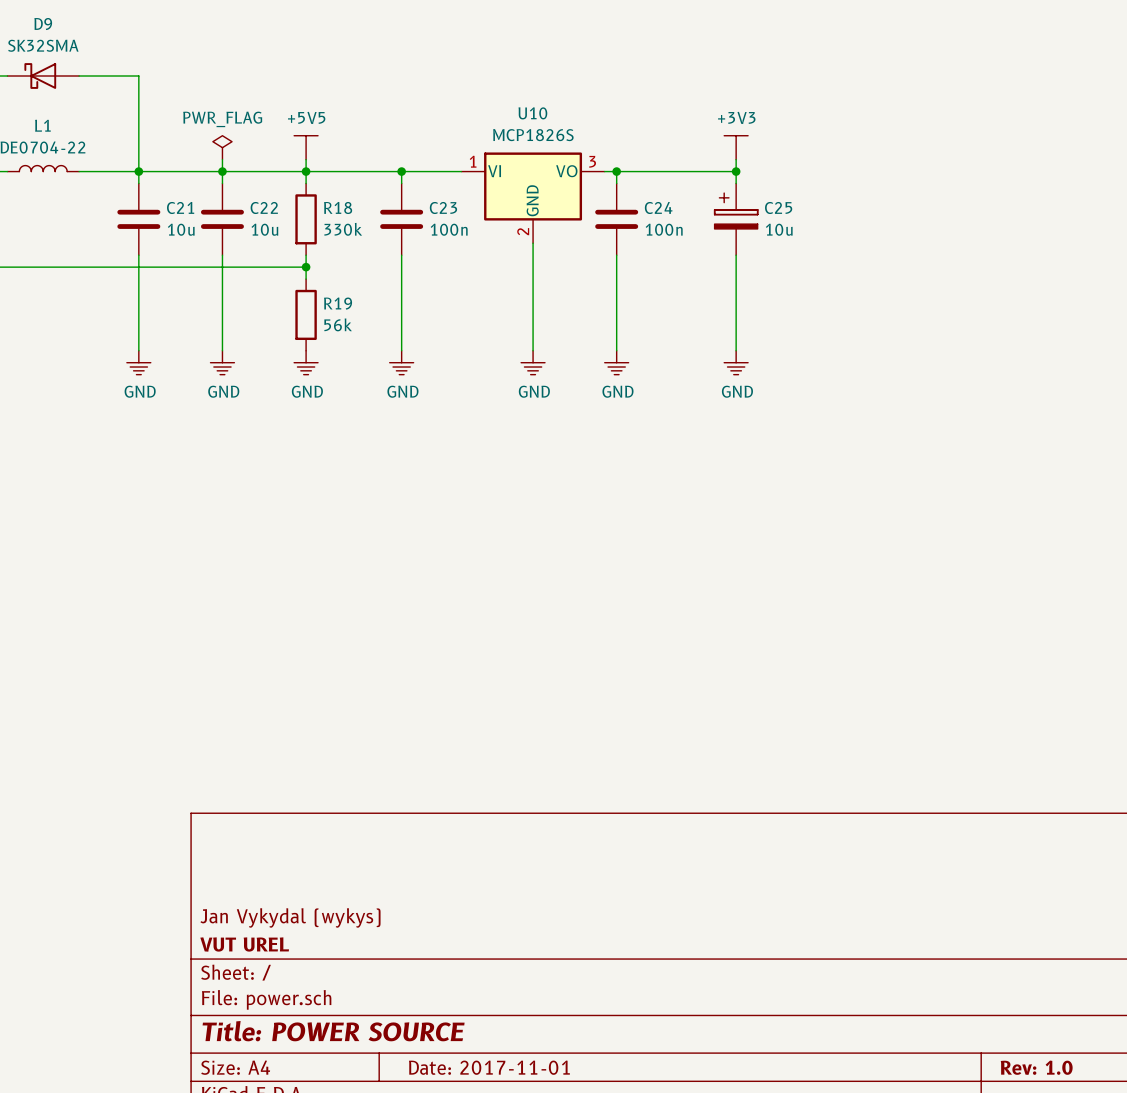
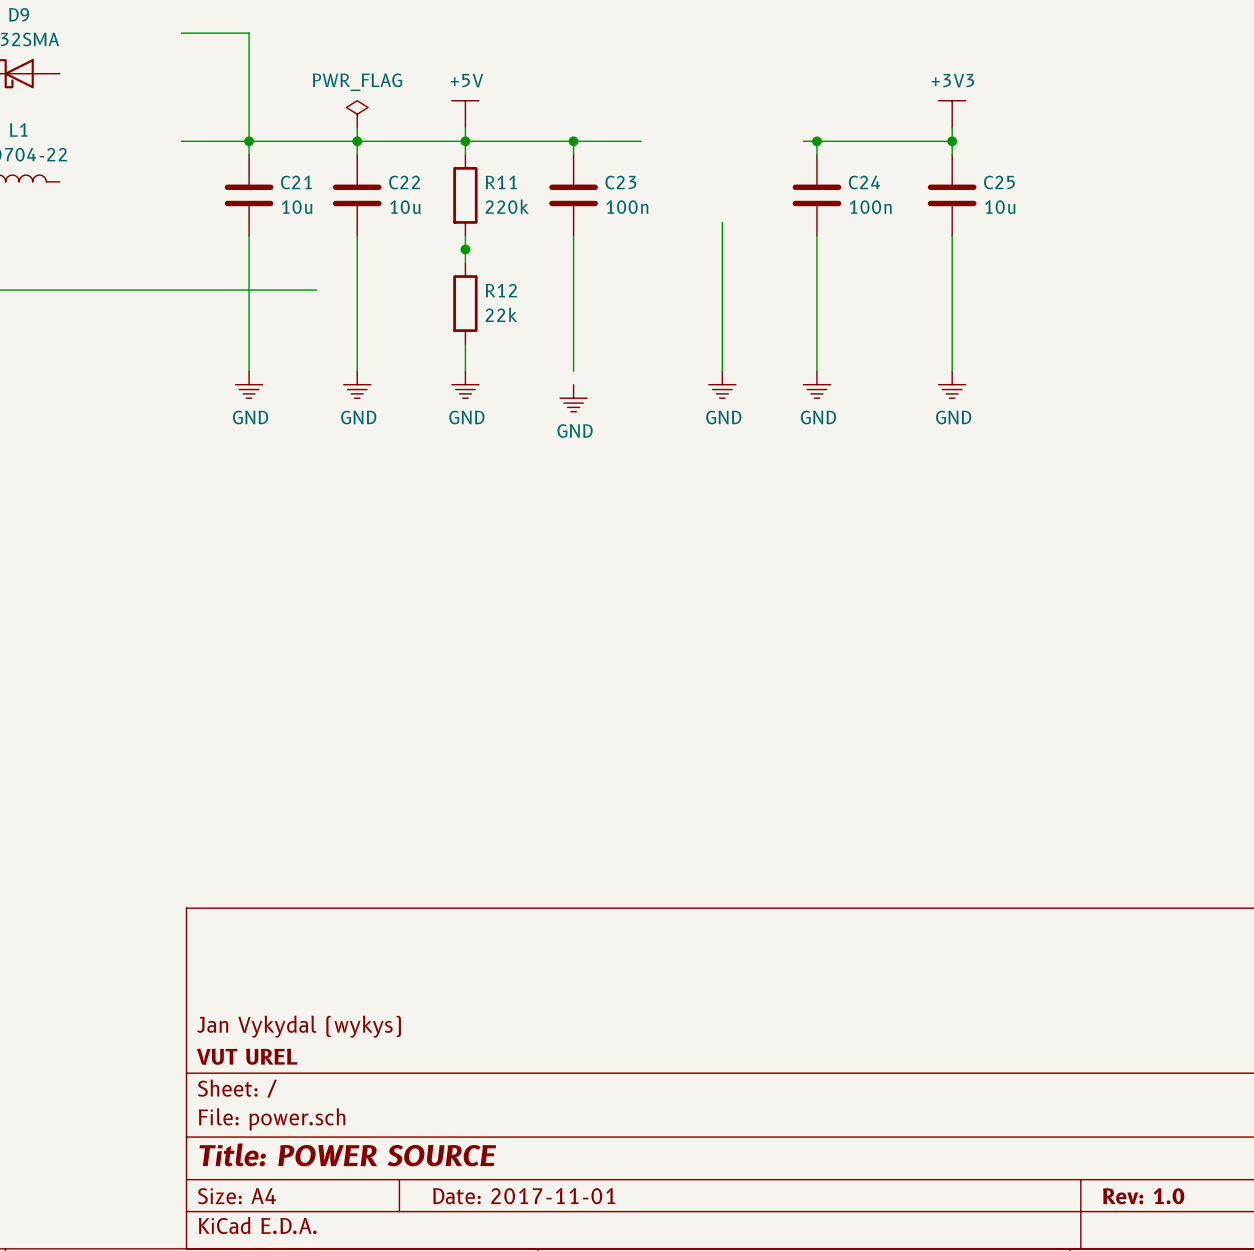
wire: (79, 76) (138, 76) (138, 183) -> (181, 33) (249, 33) (249, 154)
power symbol: none -> +5V (465, 114)
wire: none -> (181, 141) (641, 141)
junction: none -> (249, 141)
junction: none -> (357, 141)
junction: none -> (465, 141)
junction: none -> (573, 141)
junction: none -> (952, 141)
power symbol position: PWR_FLAG (222, 147) -> PWR_FLAG (357, 114)
power symbol: +5V5 (306, 147) -> none
power symbol position: +3V3 (736, 147) -> +3V3 (952, 114)
wire: (222, 159) (222, 183) -> (357, 127) (357, 154)
wire: (306, 159) (306, 183) -> (465, 127) (465, 154)
wire: (736, 159) (736, 183) -> (952, 127) (952, 154)
wire: (79, 171) (461, 171) -> none
junction: (138, 171) -> none
junction: (222, 171) -> none
junction: (306, 171) -> none
wire: (401, 171) (401, 183) -> (573, 141) (573, 154)
junction: (401, 171) -> none
wire: (604, 171) (736, 171) -> (803, 141) (952, 141)
wire: (616, 171) (616, 183) -> (816, 141) (816, 154)
junction: (616, 171) -> none
junction position: (736, 171) -> (816, 141)
R11: none -> 220k (465, 195)
C25 symbol: [714, 183, 758, 256] -> [927, 154, 977, 236]
U10: MCP1826S (533, 197) -> none
wire: none -> (722, 222) (722, 371)
C21 position: (138, 219) -> (249, 195)
C22 position: (222, 219) -> (357, 195)
wire: none -> (249, 235) (249, 371)
R18: 330k (306, 219) -> none
wire: none -> (357, 235) (357, 371)
C23 position: (401, 219) -> (573, 195)
C24 position: (616, 219) -> (816, 195)
wire: none -> (816, 235) (816, 371)
wire: none -> (952, 235) (952, 371)
junction: none -> (465, 249)
wire: (138, 255) (138, 350) -> none
wire: (222, 255) (222, 350) -> none
wire: (306, 255) (306, 279) -> (465, 235) (465, 263)
wire: (401, 255) (401, 350) -> none
wire: (616, 255) (616, 350) -> none
wire: (736, 255) (736, 350) -> none
junction: (306, 267) -> none
R12: none -> 22k (465, 303)
R19: 56k (306, 314) -> none
wire: none -> (465, 344) (465, 371)
wire: (533, 338) (533, 350) -> none
power symbol: none -> GND (357, 384)
power symbol: none -> GND (465, 384)
power symbol: none -> GND (722, 384)
power symbol: none -> GND (952, 384)
power symbol: GND (138, 362) -> none
power symbol position: GND (222, 362) -> GND (249, 384)
power symbol: GND (306, 362) -> none
power symbol: GND (401, 362) -> none
power symbol: GND (616, 362) -> none
power symbol position: GND (736, 362) -> GND (816, 384)

